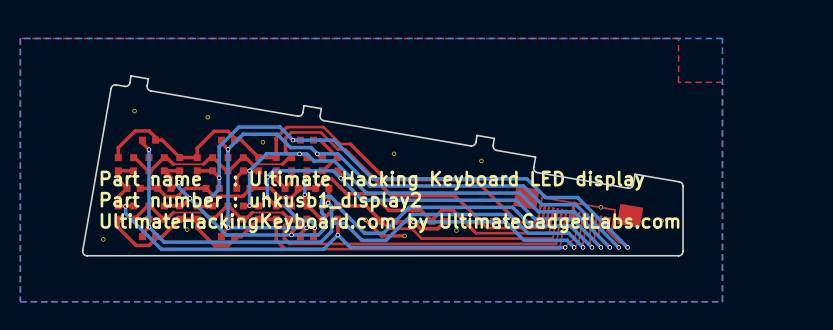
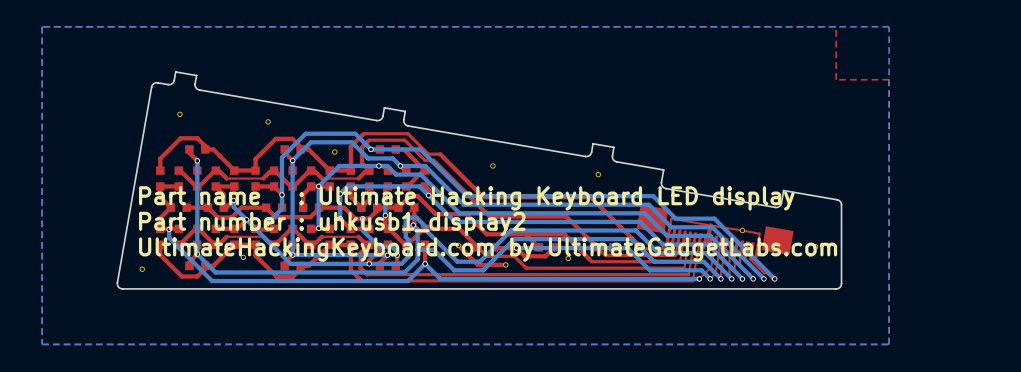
top track: (453, 210) (442, 210) (432, 220) -> (564, 234) (525, 234)

